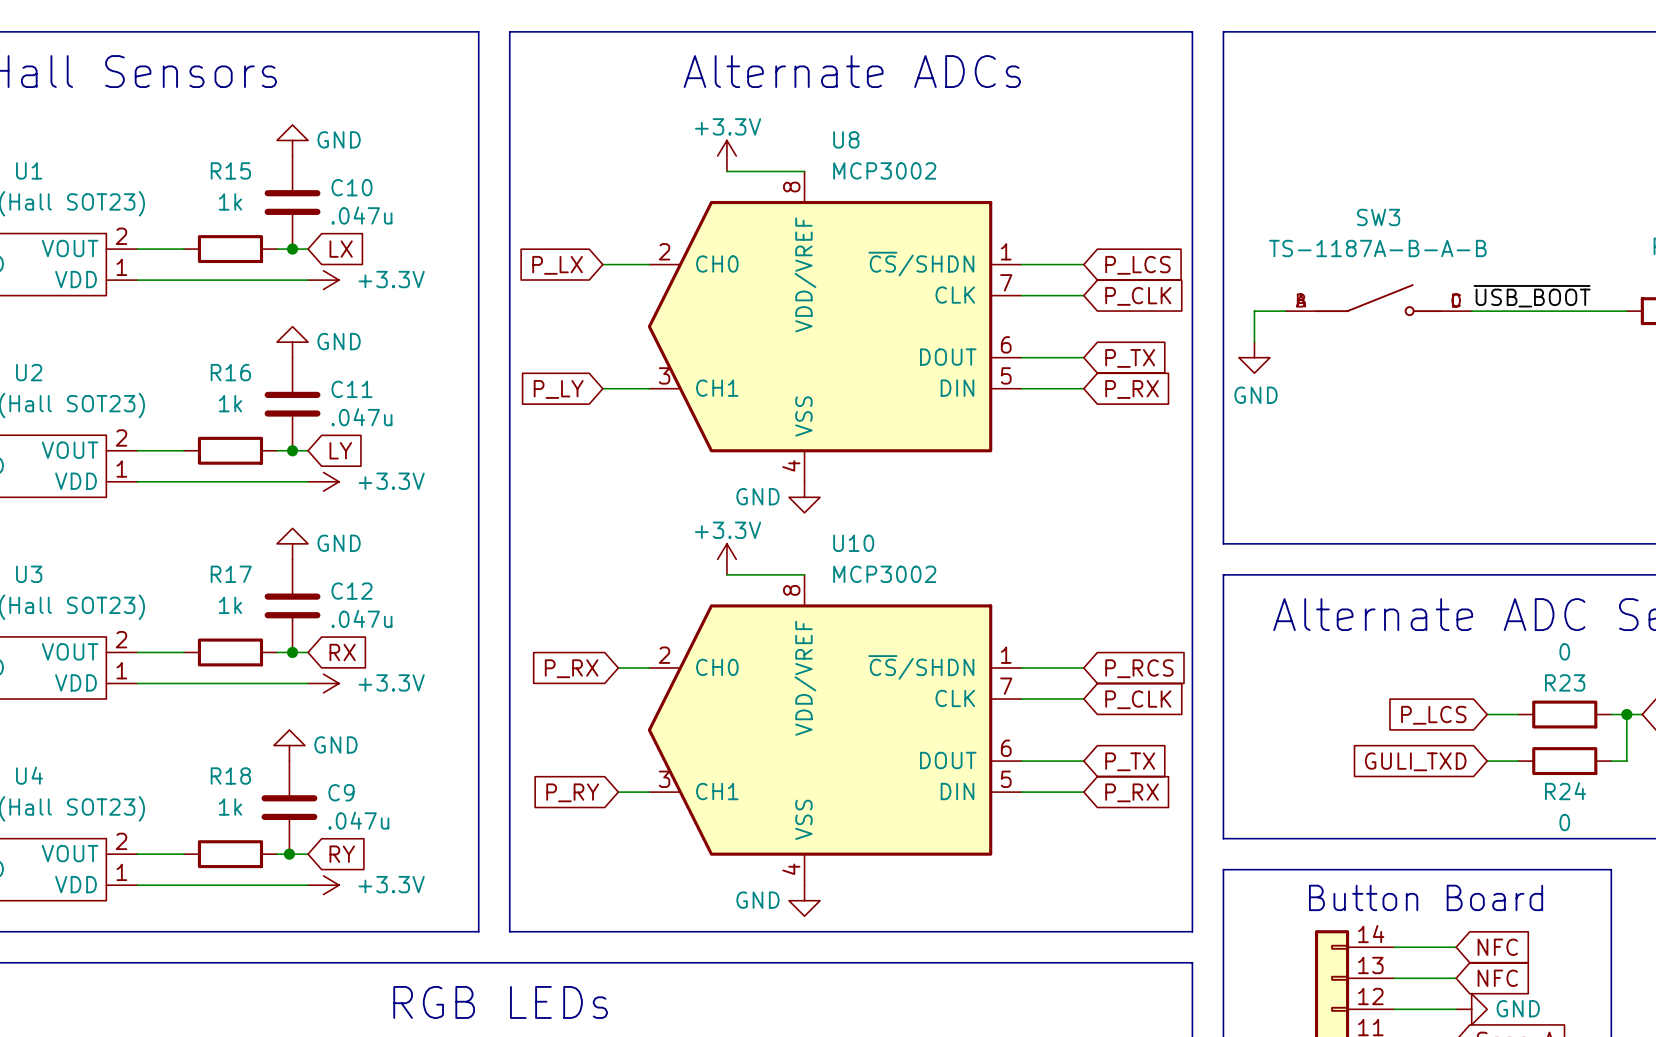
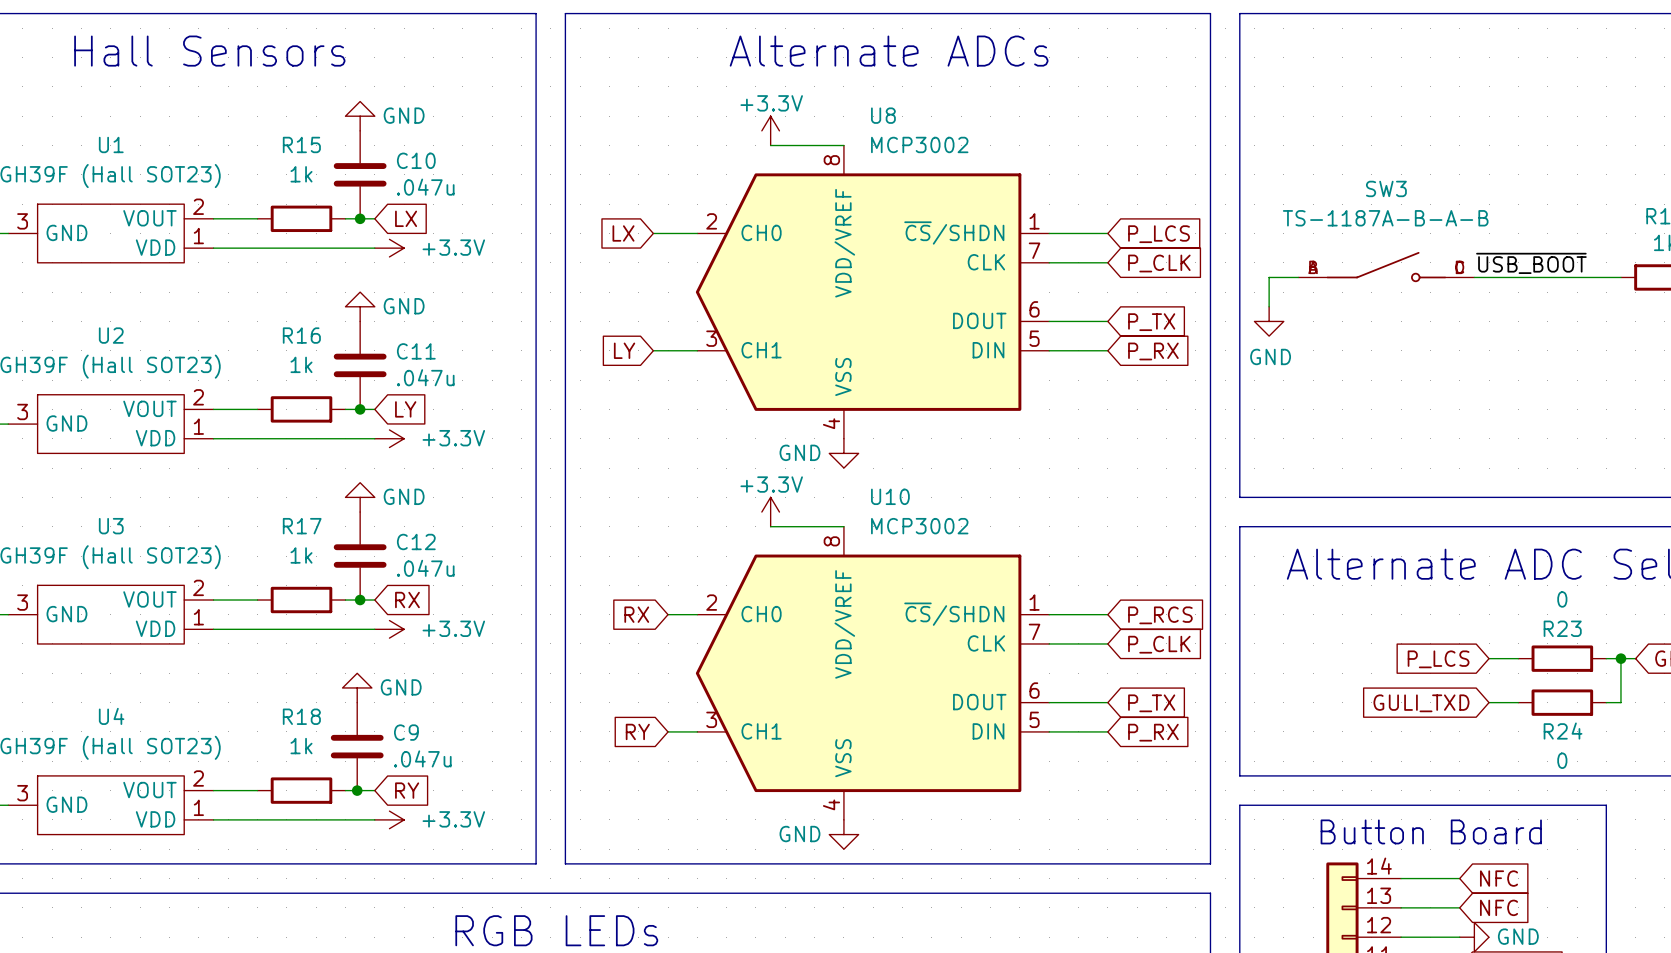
global label: P_LX (557, 265) -> LX (623, 233)
global label: P_LY (558, 389) -> LY (624, 350)
global label: P_RX (571, 668) -> RX (636, 614)
global label: P_RY (572, 792) -> RY (637, 731)

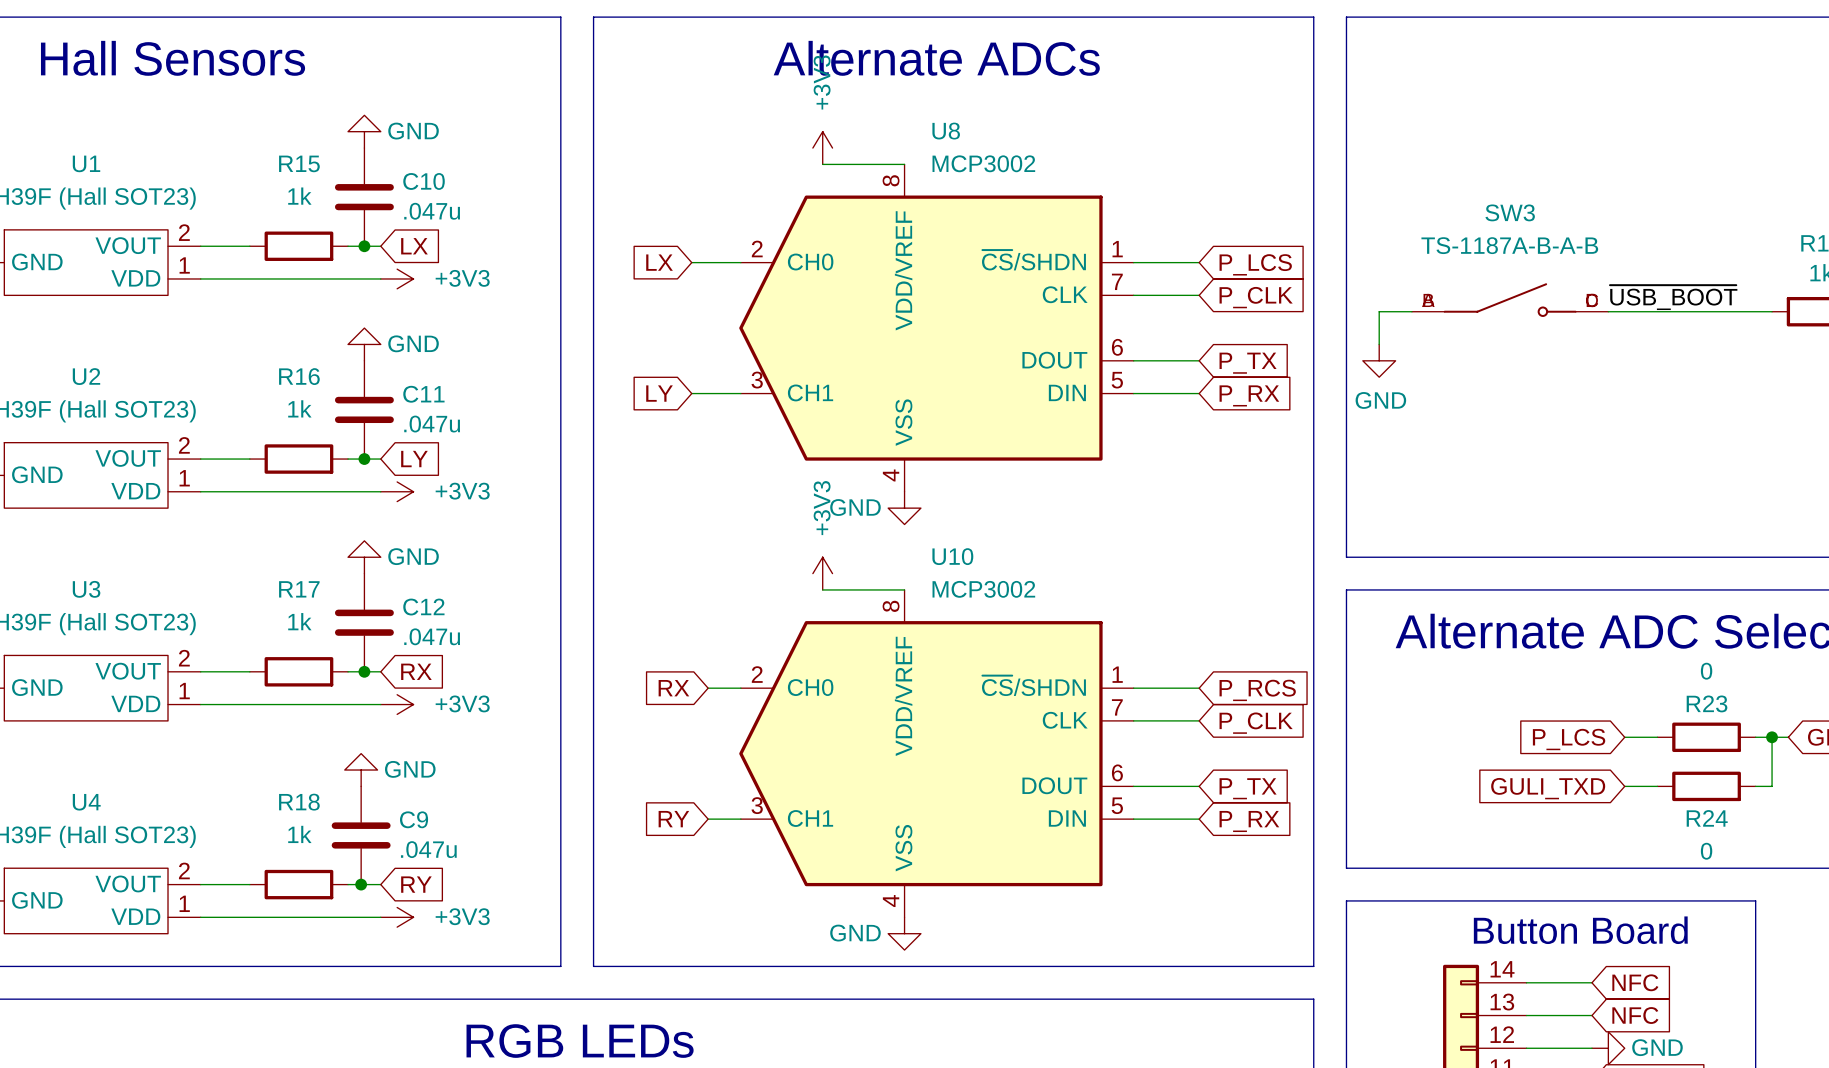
power symbol: +3.3V (770, 130) -> +3V3 (822, 148)
power symbol: +3.3V (389, 248) -> +3V3 (397, 278)
power symbol: +3.3V (389, 438) -> +3V3 (397, 491)
power symbol: +3.3V (770, 512) -> +3V3 (822, 573)
power symbol: +3.3V (389, 629) -> +3V3 (397, 704)
power symbol: +3.3V (389, 819) -> +3V3 (397, 917)

